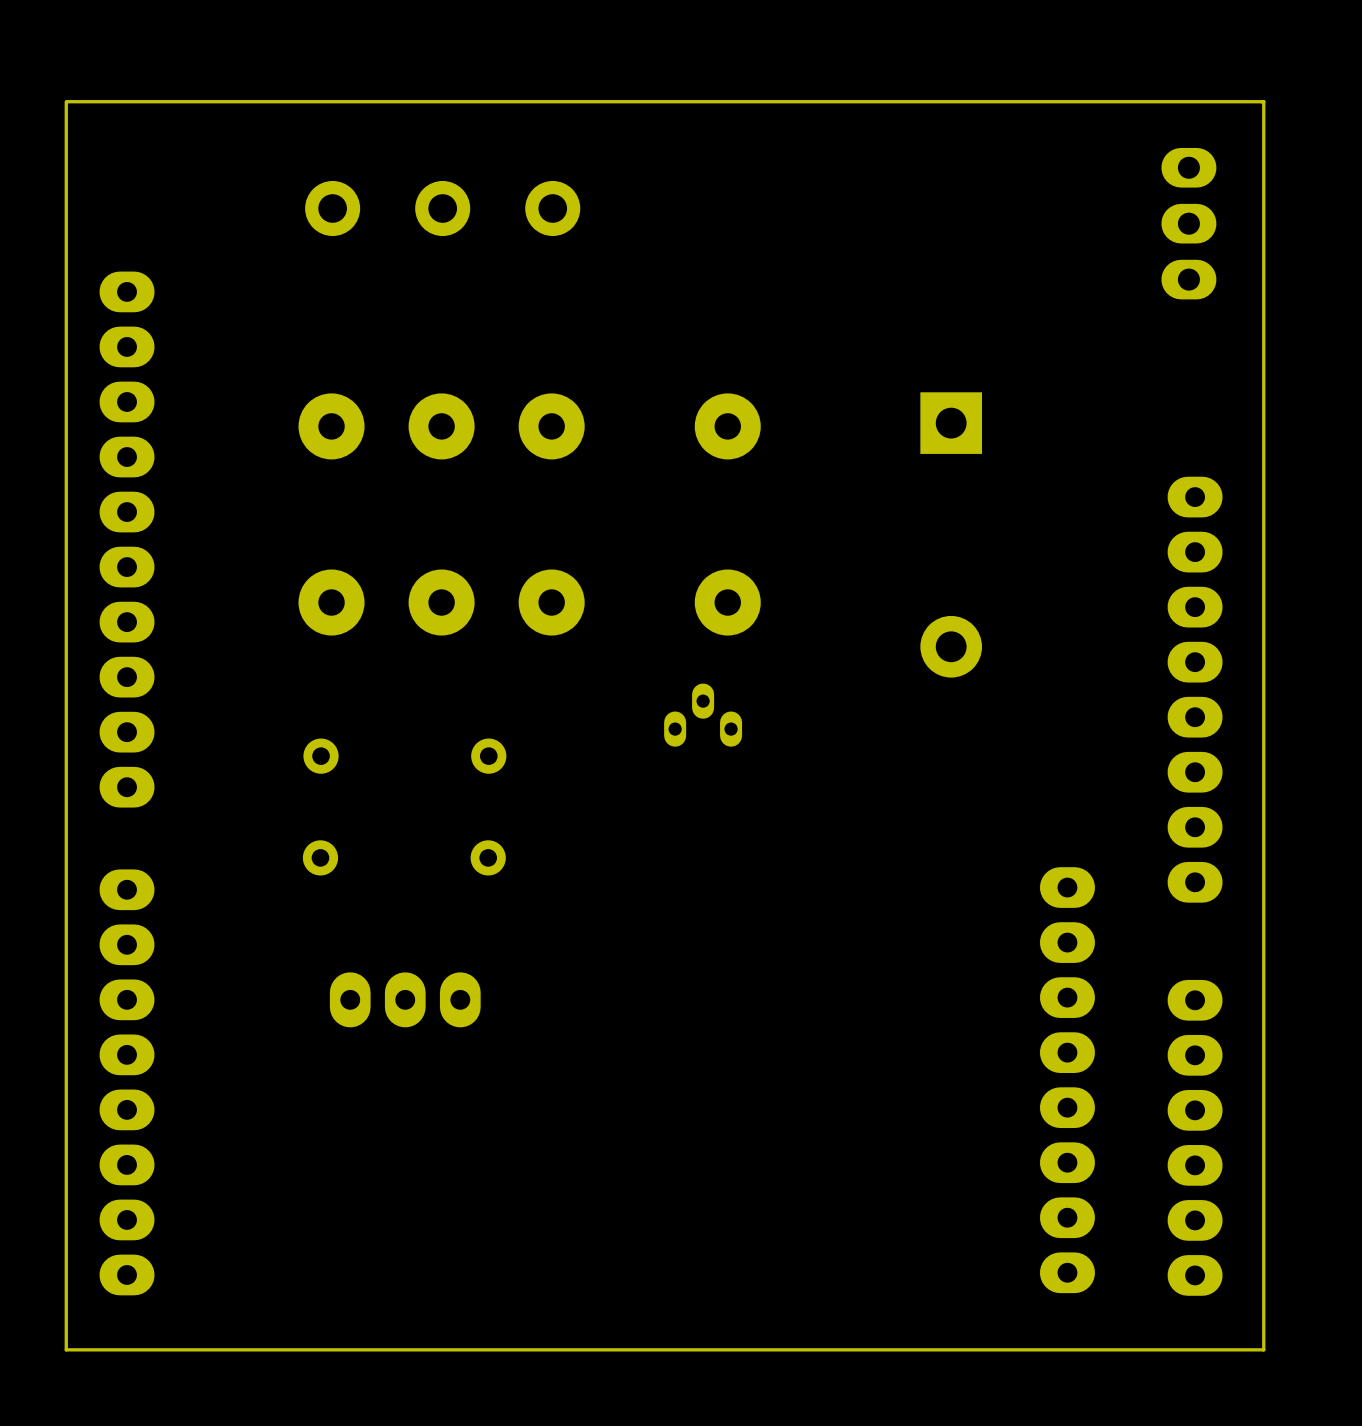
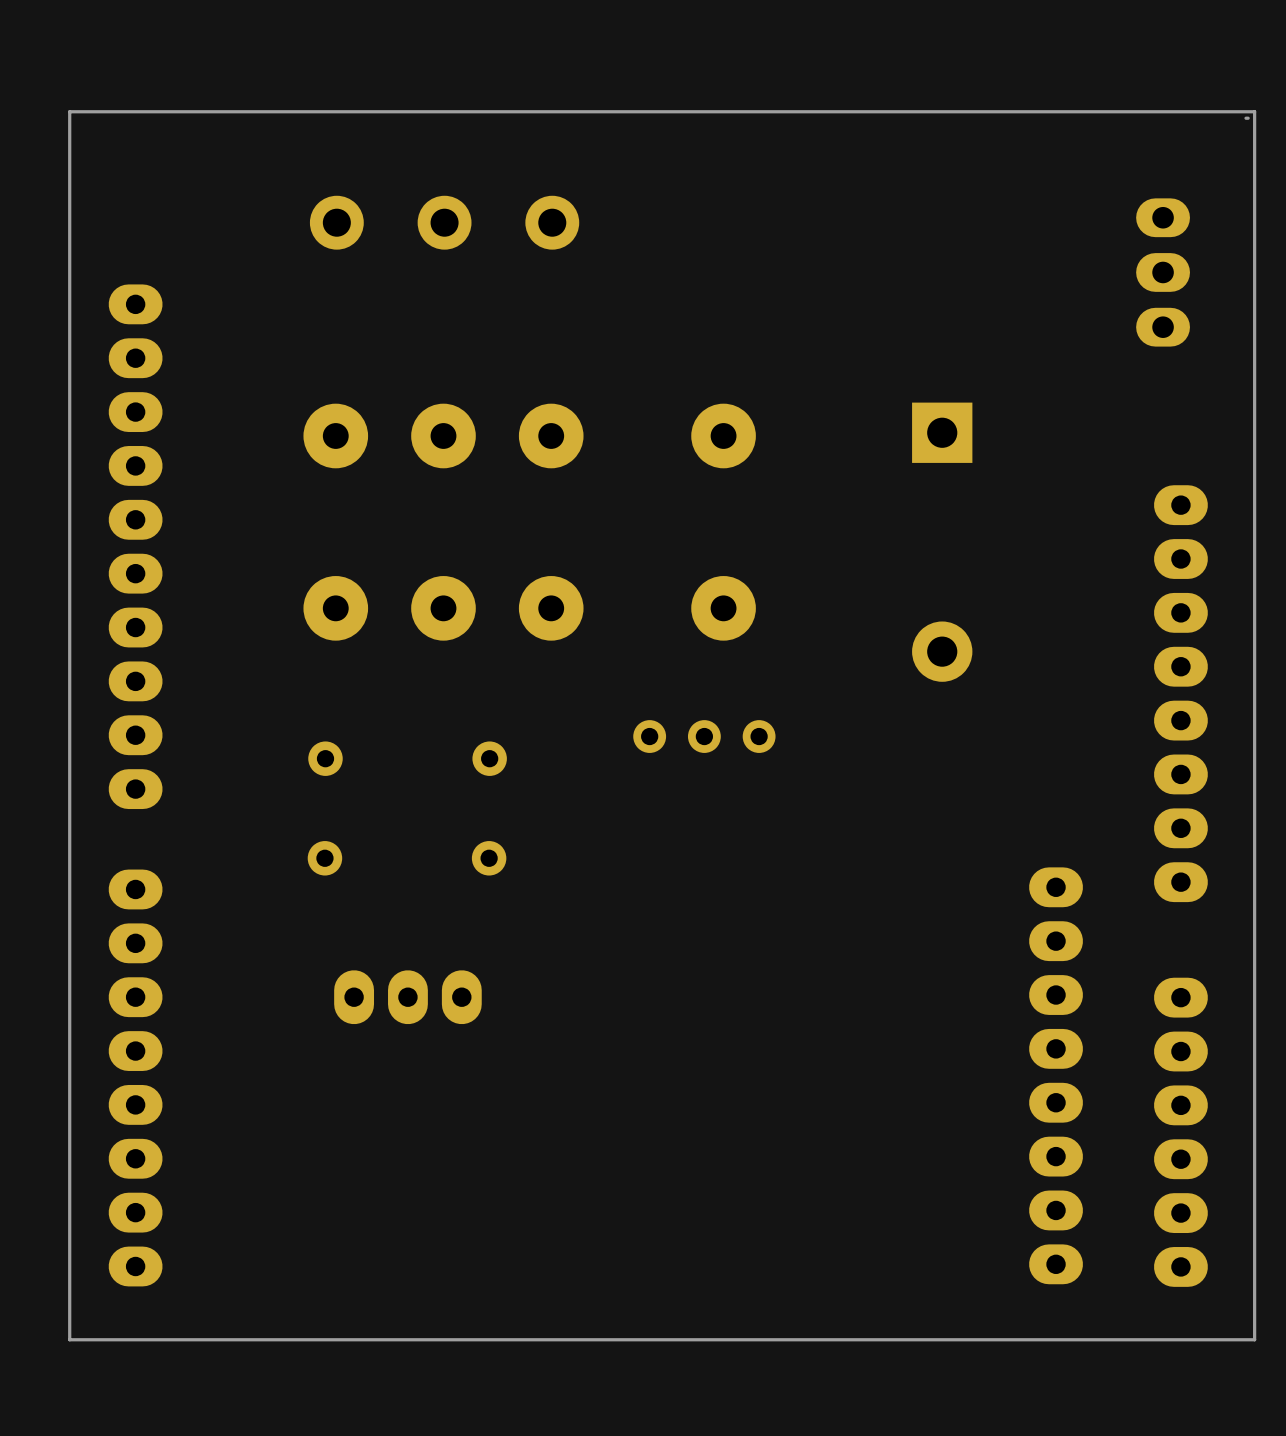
board edge: (66, 101) (66, 1349) -> none
board edge: (1261, 101) (67, 101) -> none
board edge: (1263, 101) (1263, 1349) -> (76, 1339) (69, 1339) (69, 111) (1254, 111) (1254, 1339) (1248, 1339)
part position: (1188, 223) -> (1163, 272)
part footprint: [664, 683, 743, 747] -> [633, 720, 776, 753]

